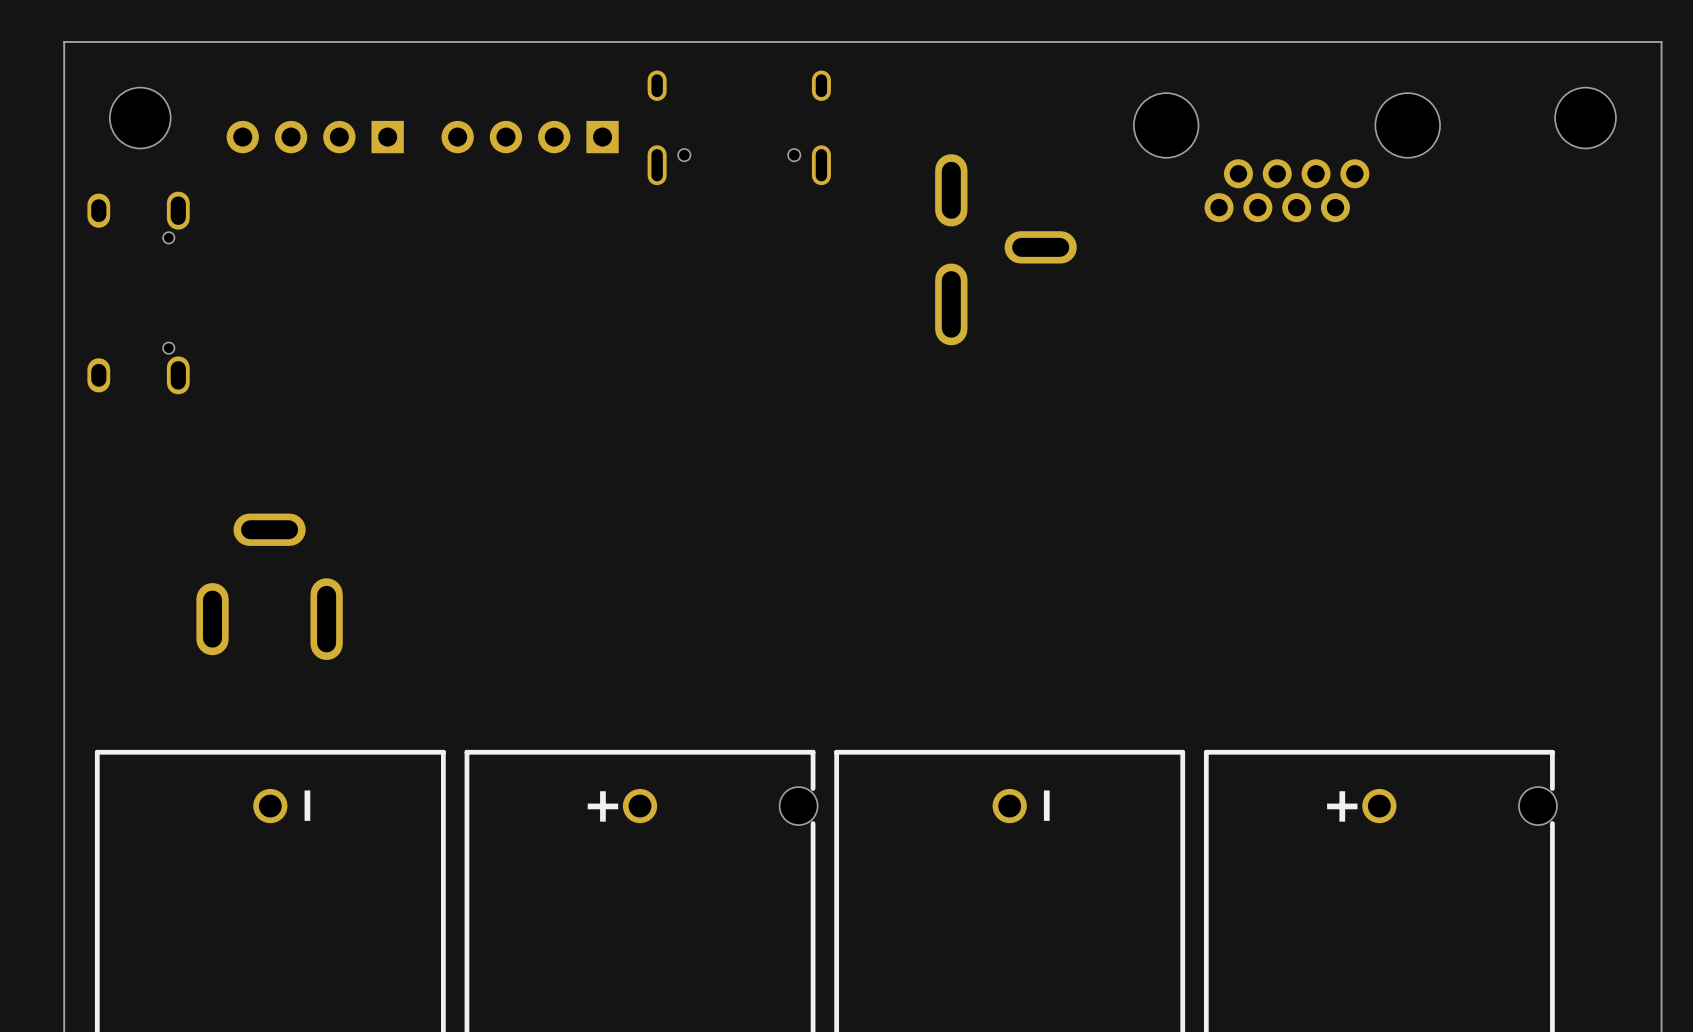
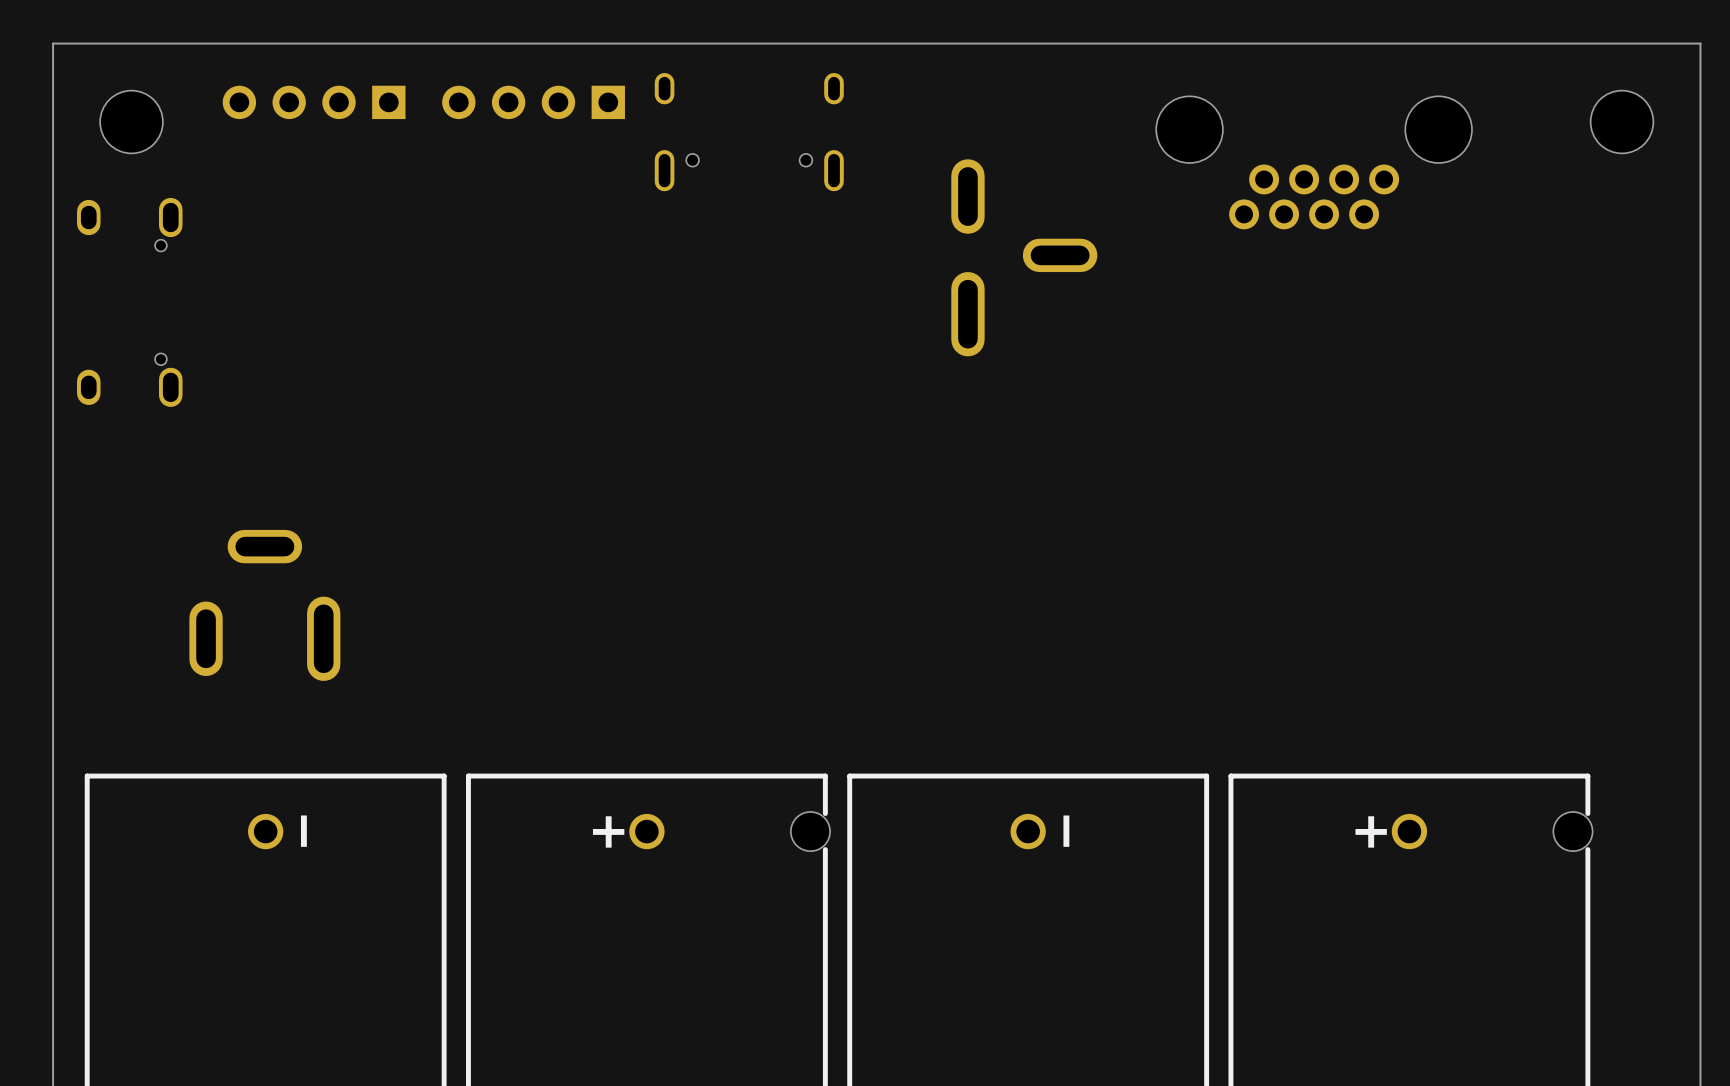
part position: (315, 137) -> (314, 102)
part position: (530, 137) -> (533, 102)

